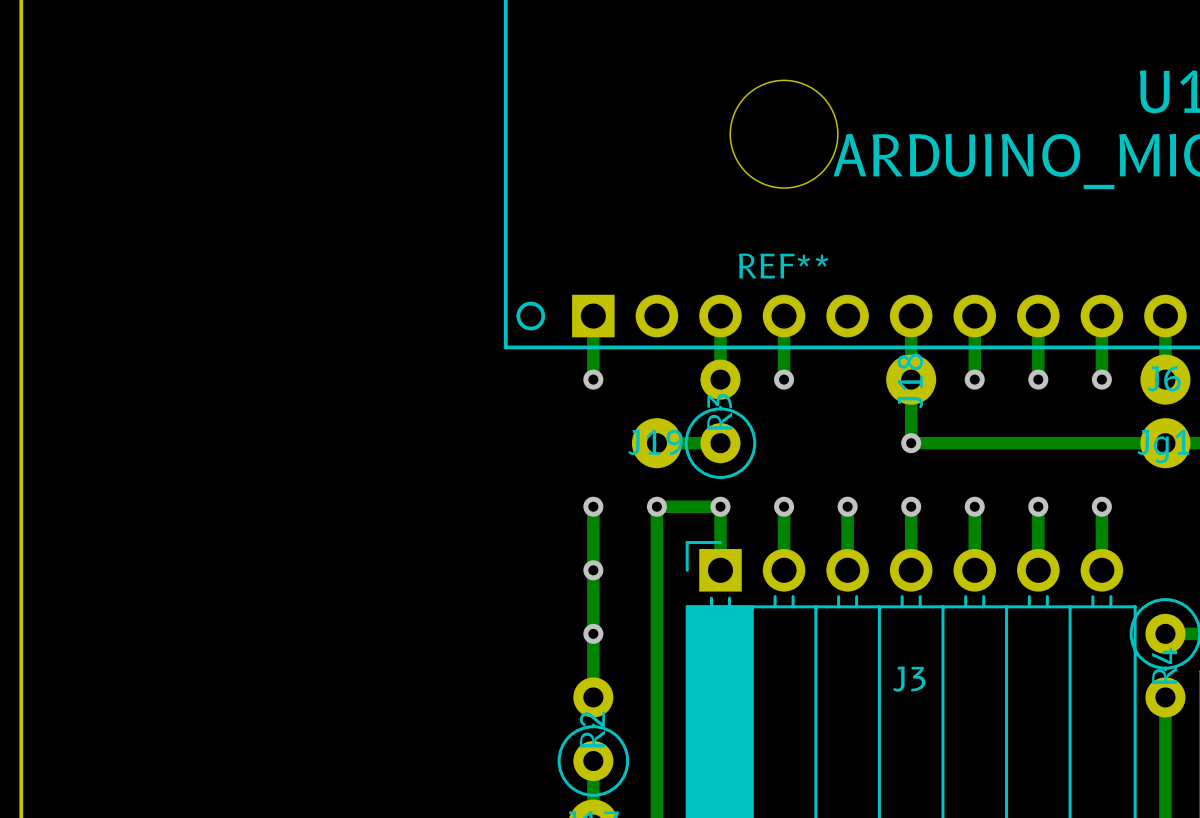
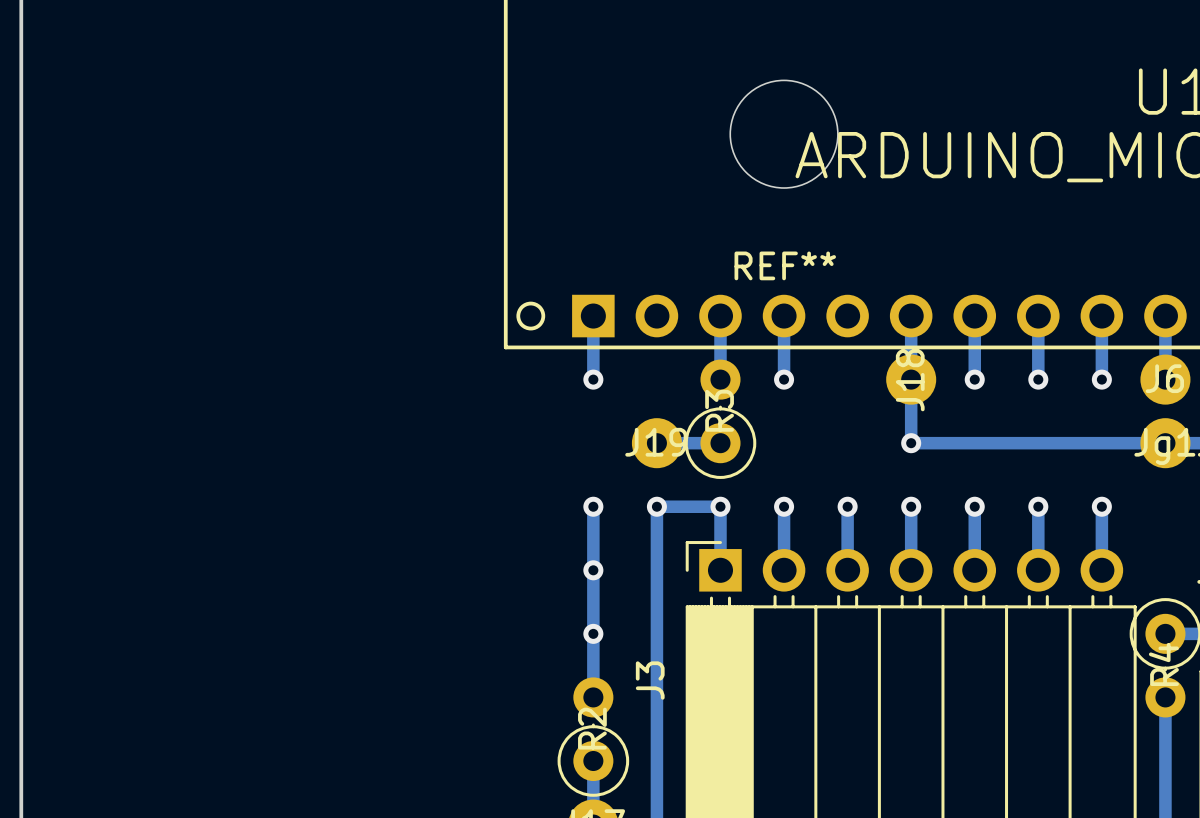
J3 name rotation: 0° (909, 679) -> 90° counterclockwise (650, 680)
J3 name position: J3 (909, 679) -> J3 (650, 680)

